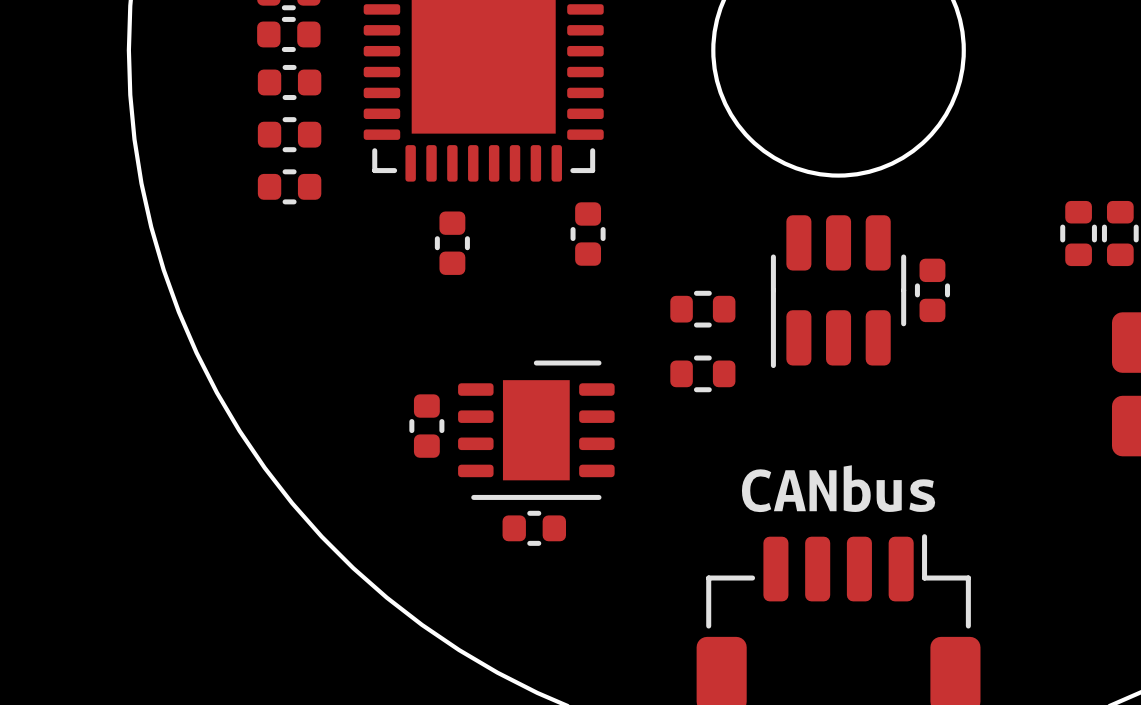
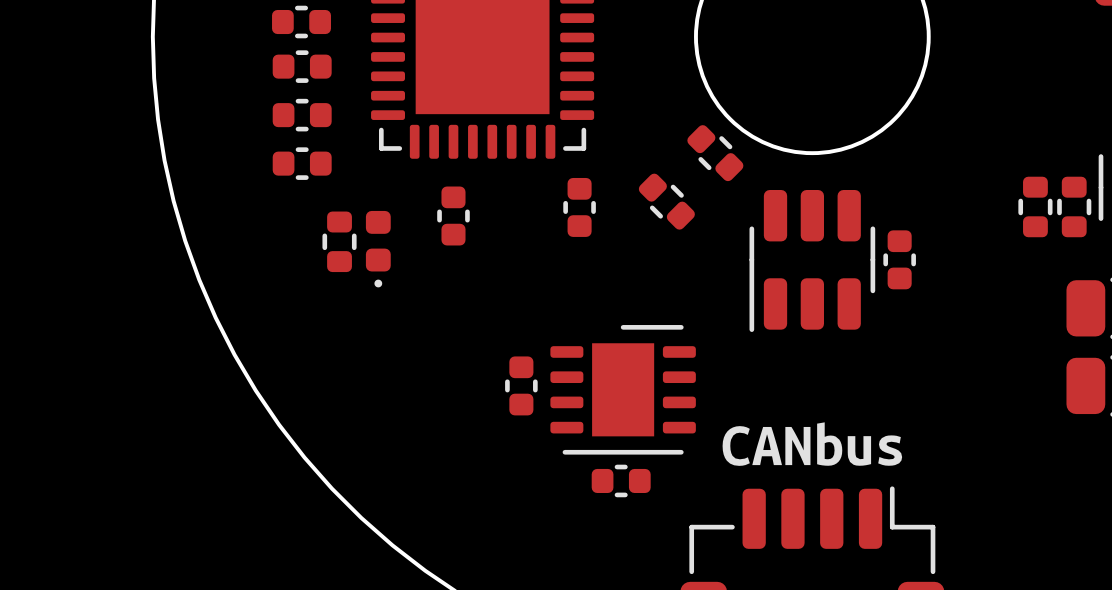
part: none -> (715, 153)
part: none -> (666, 201)
part: none -> (339, 241)
part: none -> (378, 249)
part: (702, 309) -> none
part footprint: [458, 360, 615, 500] -> [505, 356, 538, 416]
part: (702, 373) -> none
part: (426, 426) -> none
part: none -> (623, 389)
part position: (534, 528) -> (621, 480)

